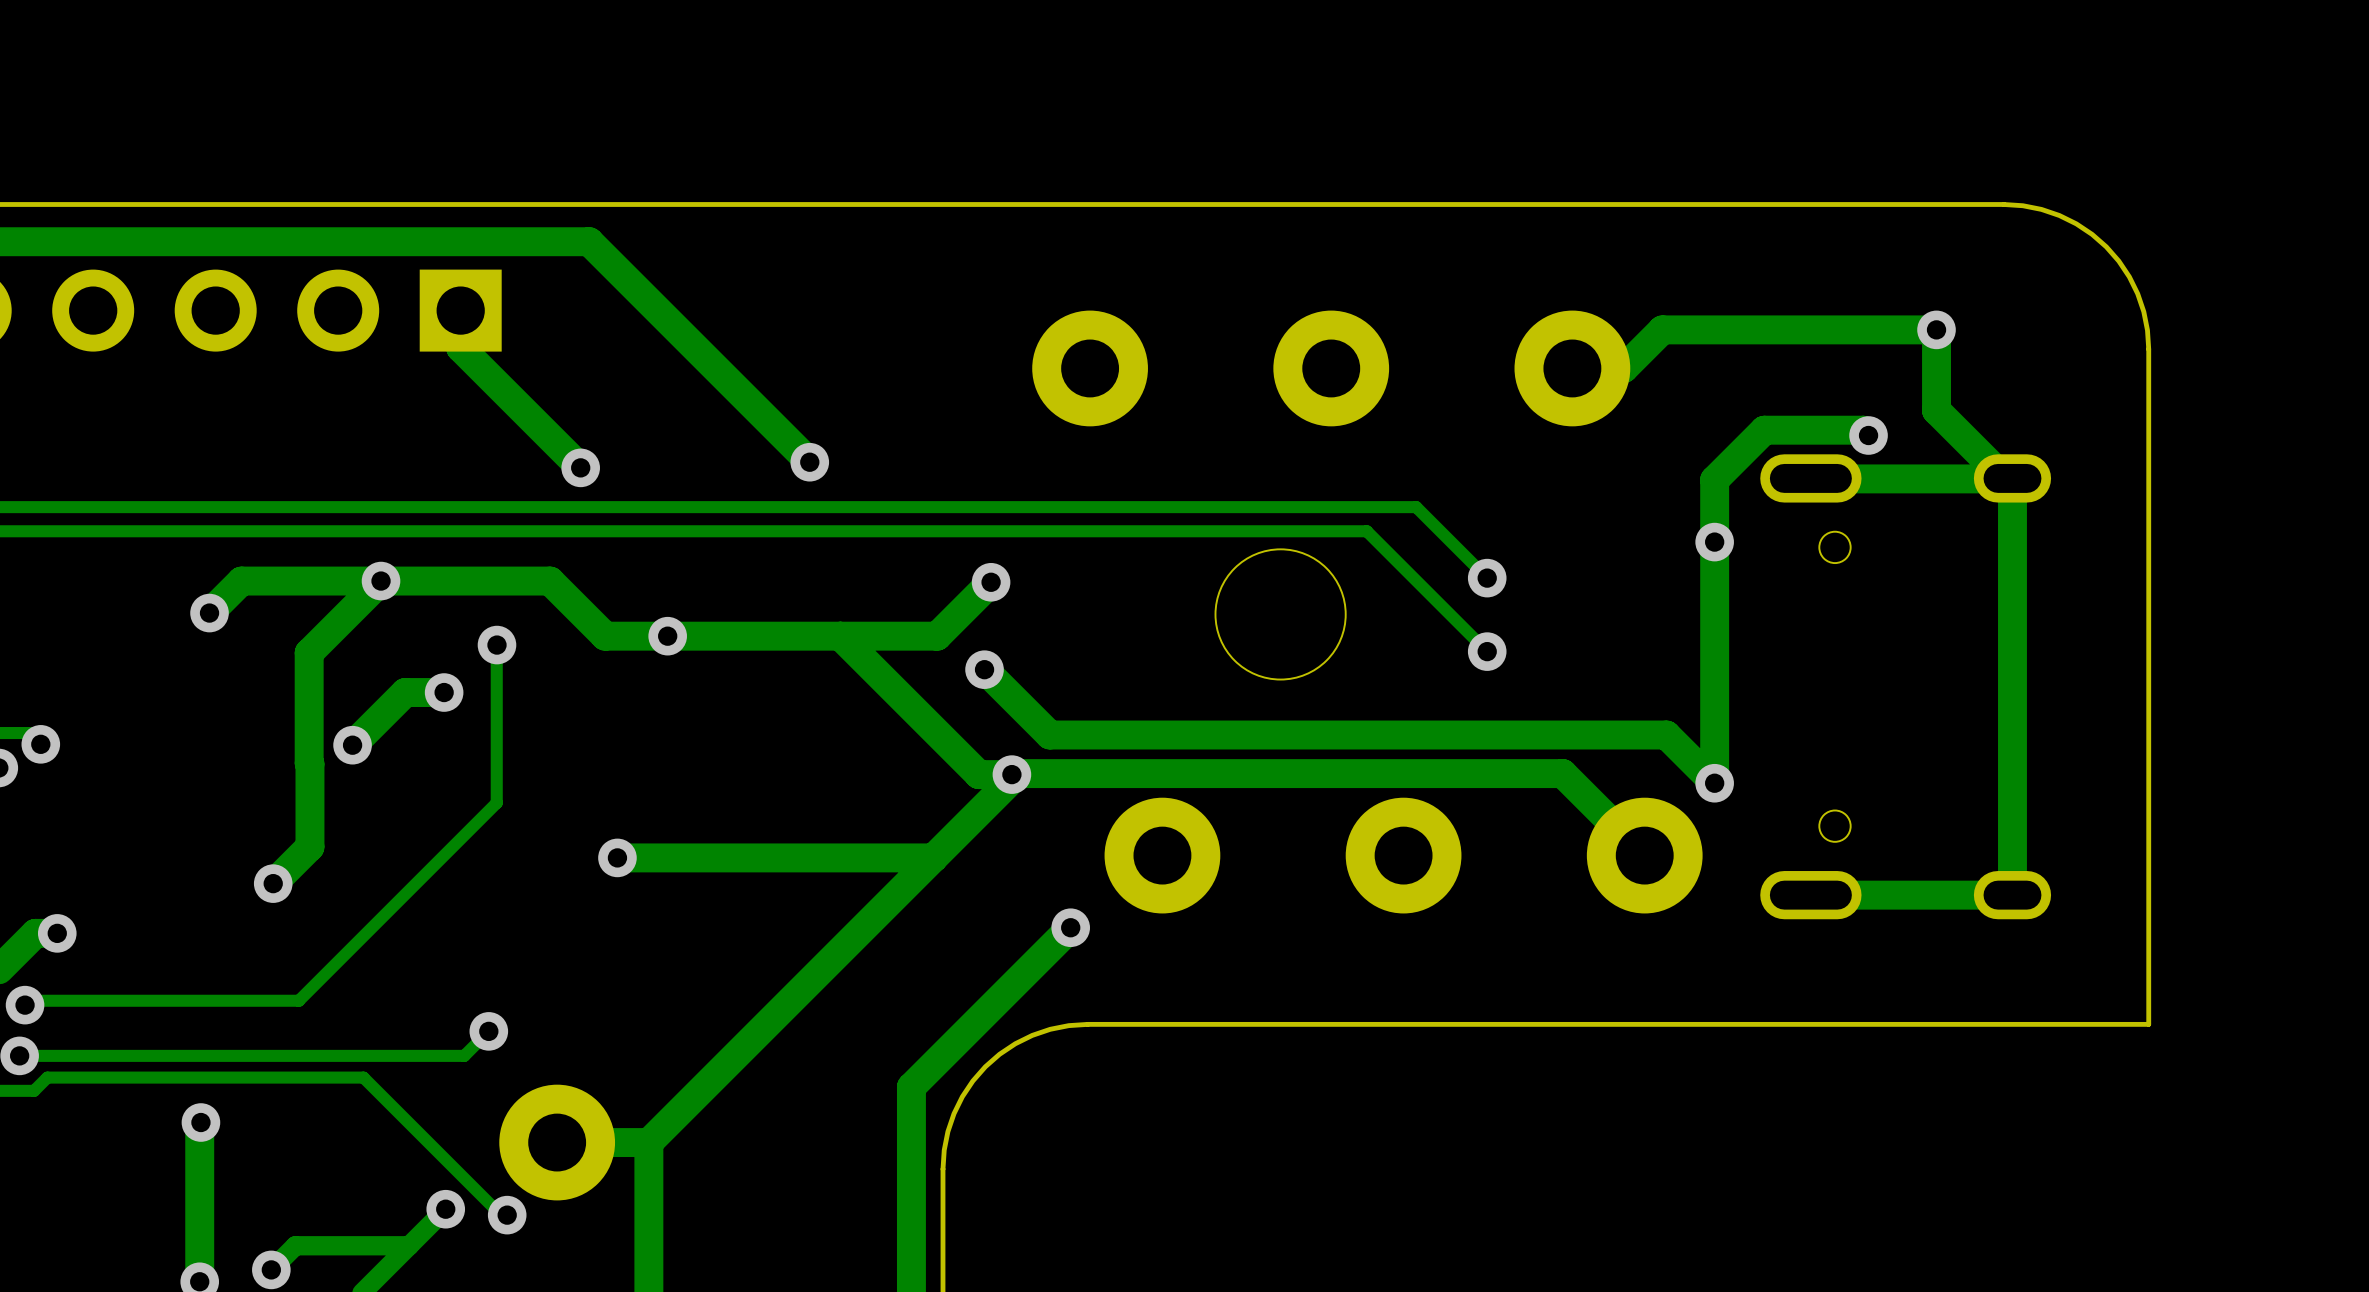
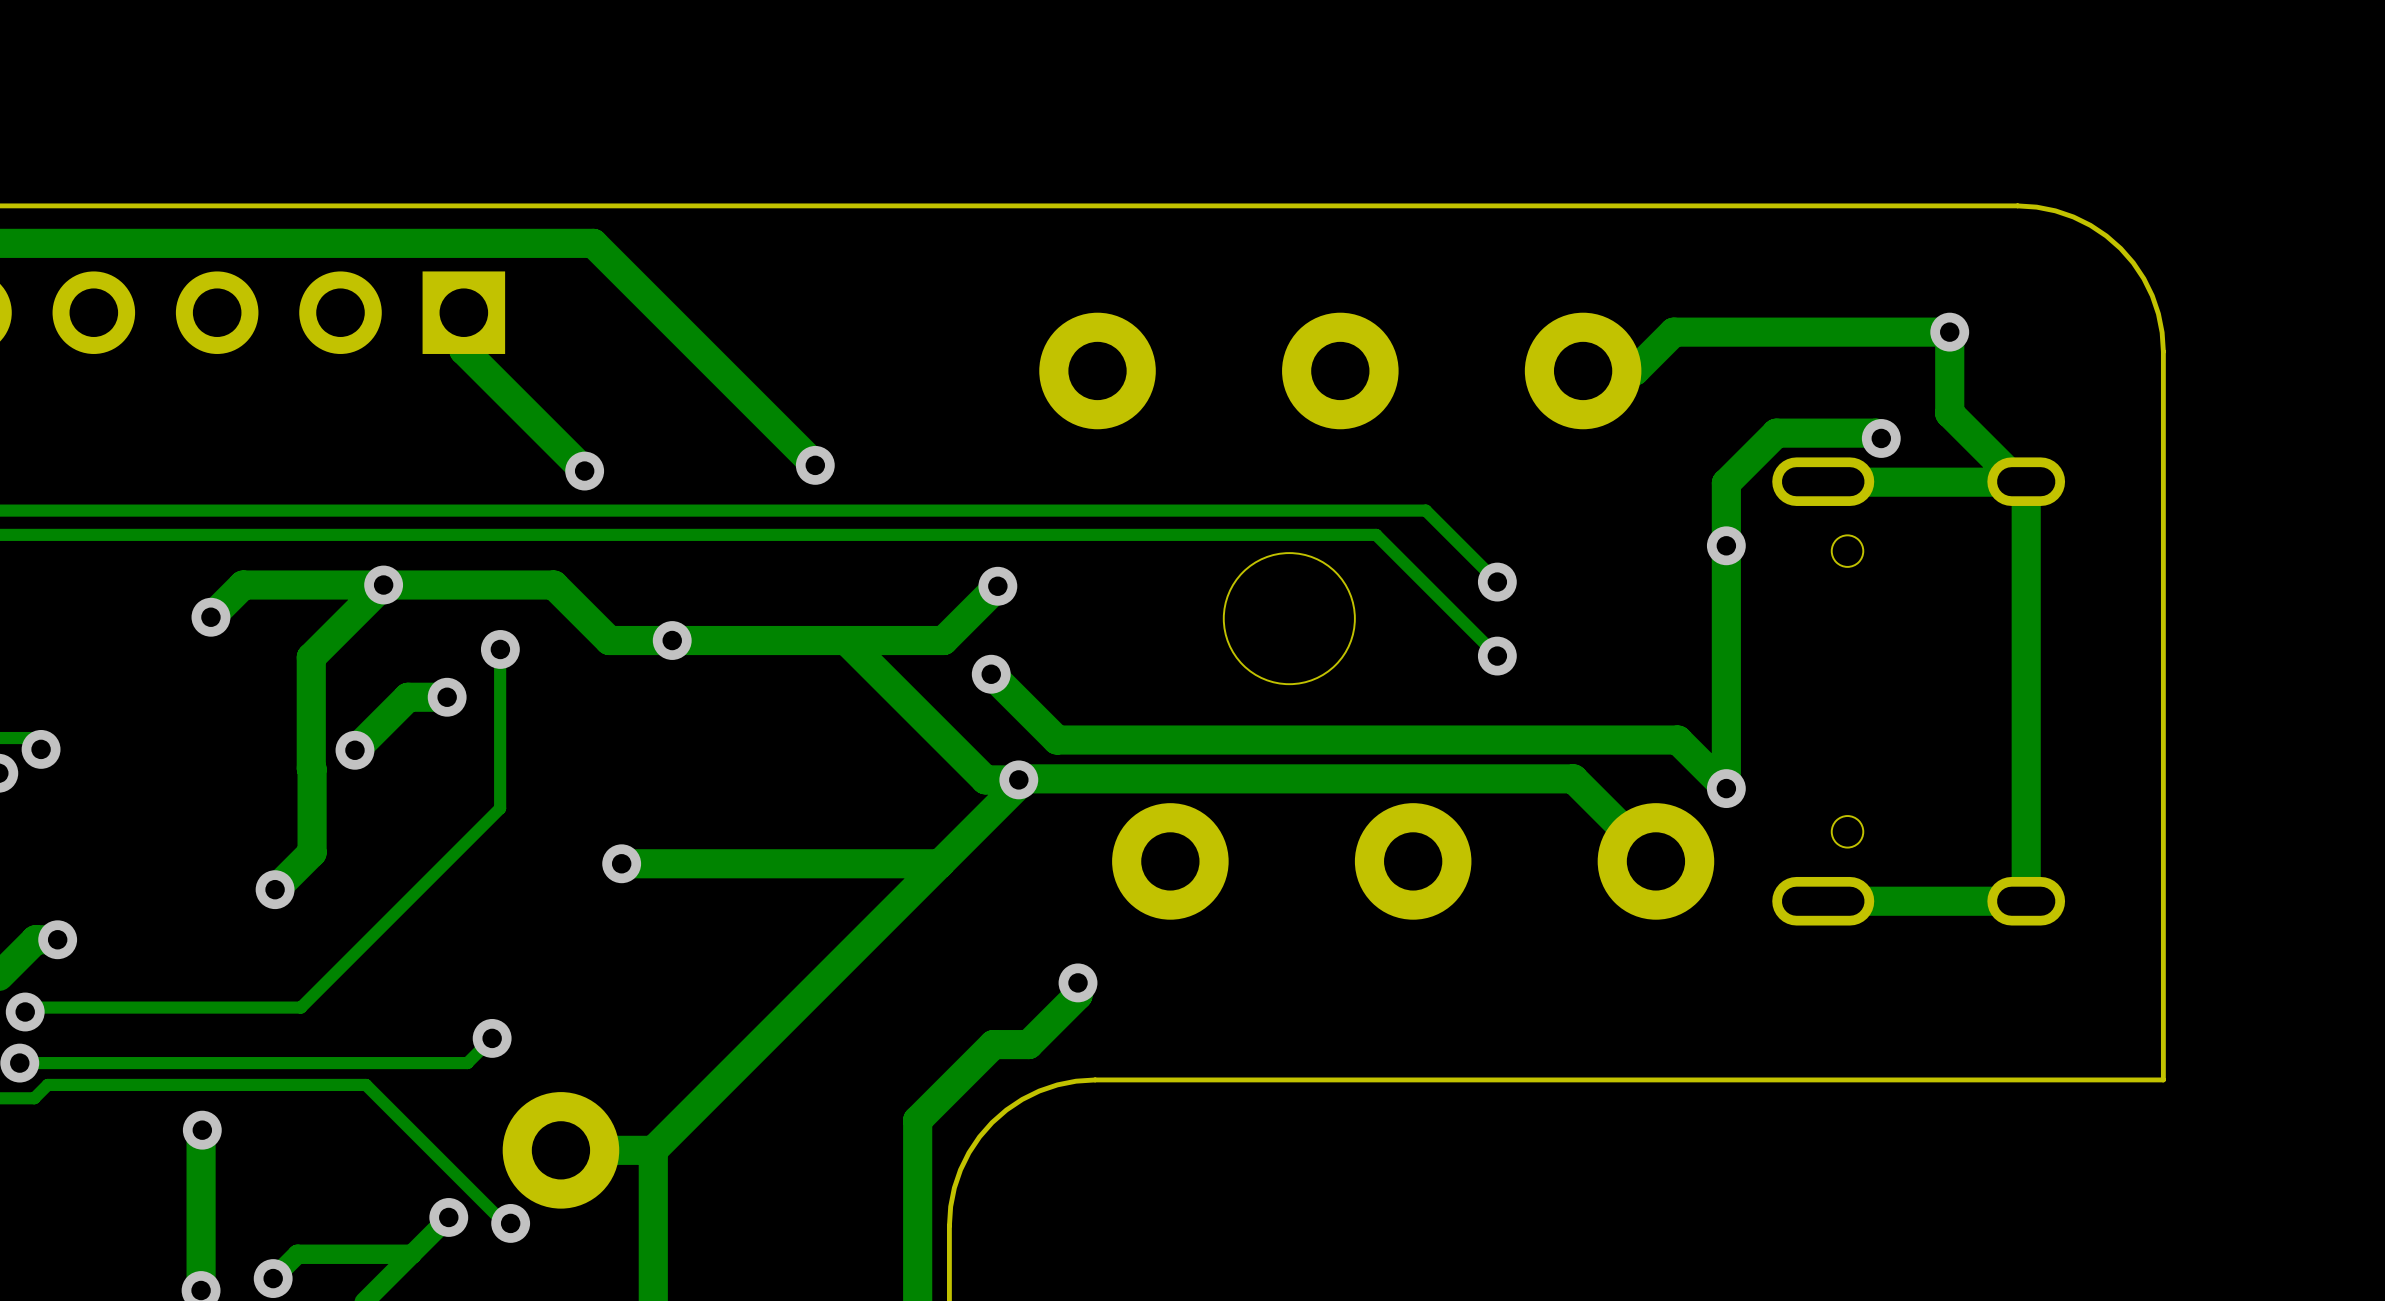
track: (1070, 927) (911, 1086) (911, 1112) -> (1078, 982) (1078, 995) (1028, 1044) (993, 1044) (917, 1120)
via position: (1070, 927) -> (1078, 982)
board edge: (2148, 1024) (1068, 1025) (1032, 1035) (999, 1054) (972, 1080) (962, 1096) (947, 1131) (944, 1150) (942, 1217) -> (2163, 1031) (2163, 1079) (1076, 1081) (1057, 1084) (1022, 1099) (1006, 1110) (979, 1136) (968, 1152) (954, 1187) (949, 1225)

